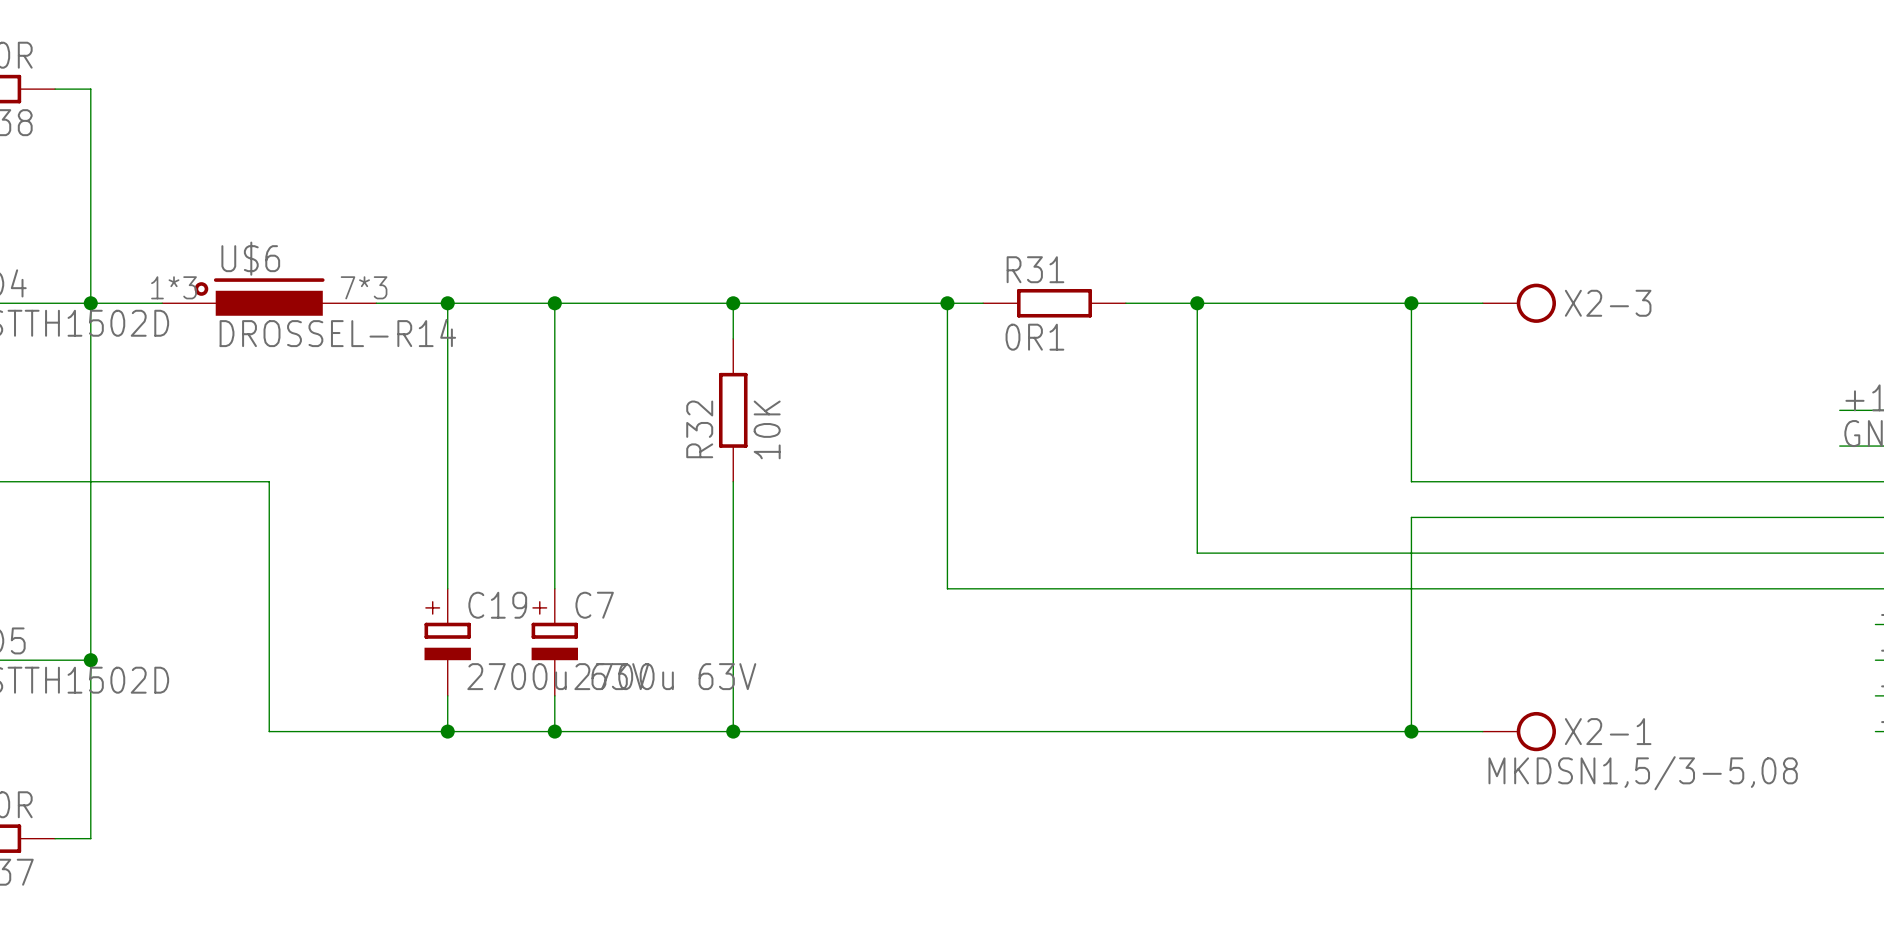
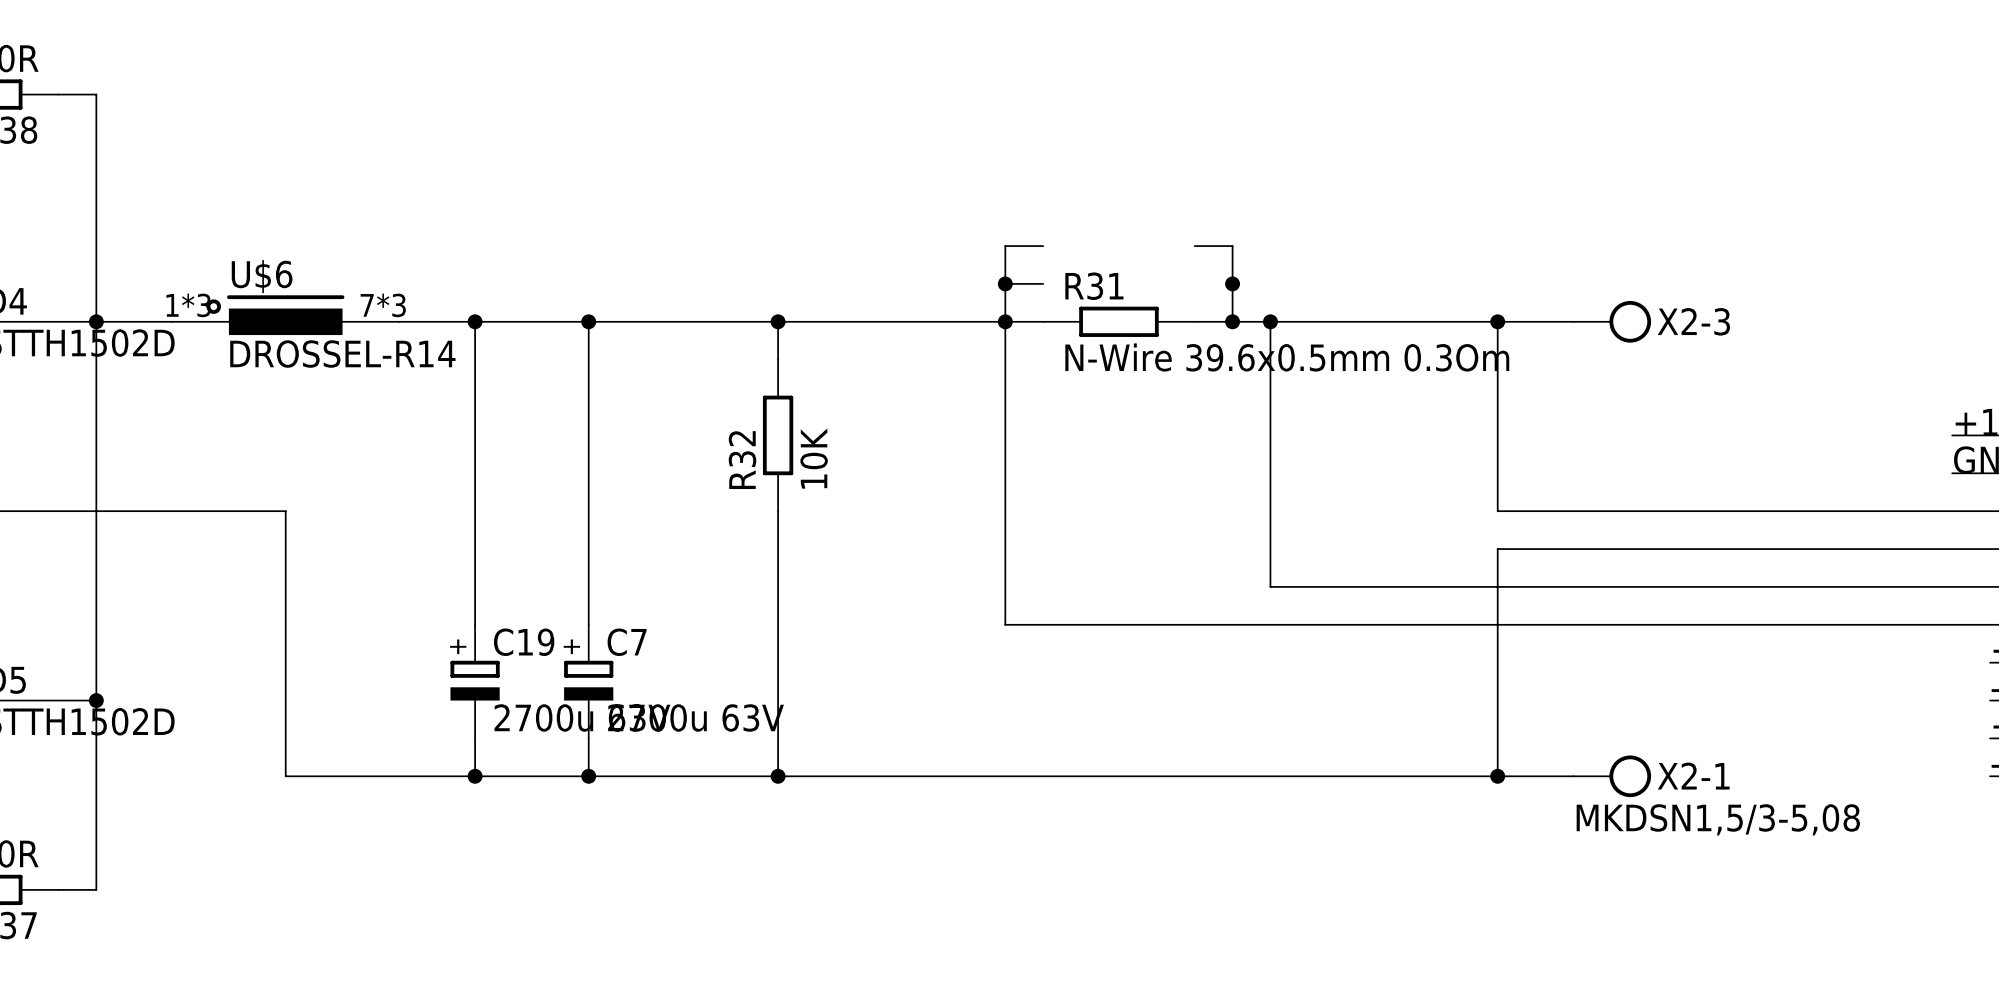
wire: none -> (1043, 246) (1005, 246) (1005, 321)
wire: none -> (1194, 246) (1232, 246) (1232, 321)
wire: none -> (1005, 283) (1043, 283)
junction: none -> (1005, 283)
junction: none -> (1232, 283)
junction: none -> (1232, 321)
R31 value: 0R1 (1034, 337) -> N-Wire 39.6x0.5mm 0.3Om (1287, 357)

